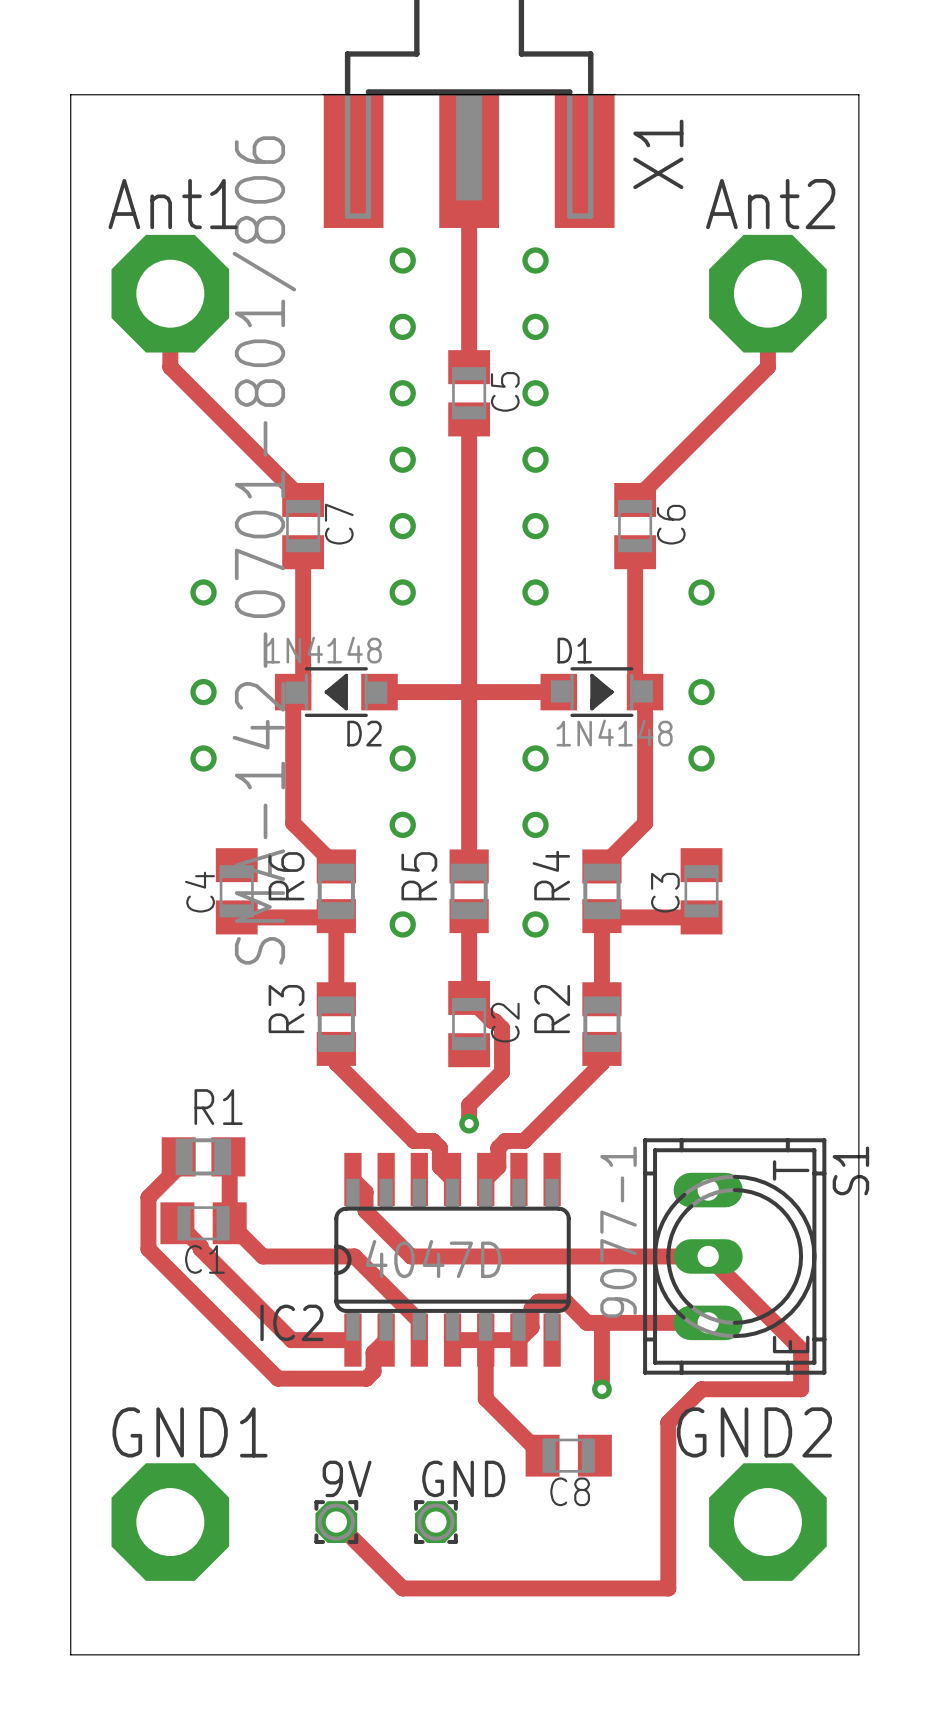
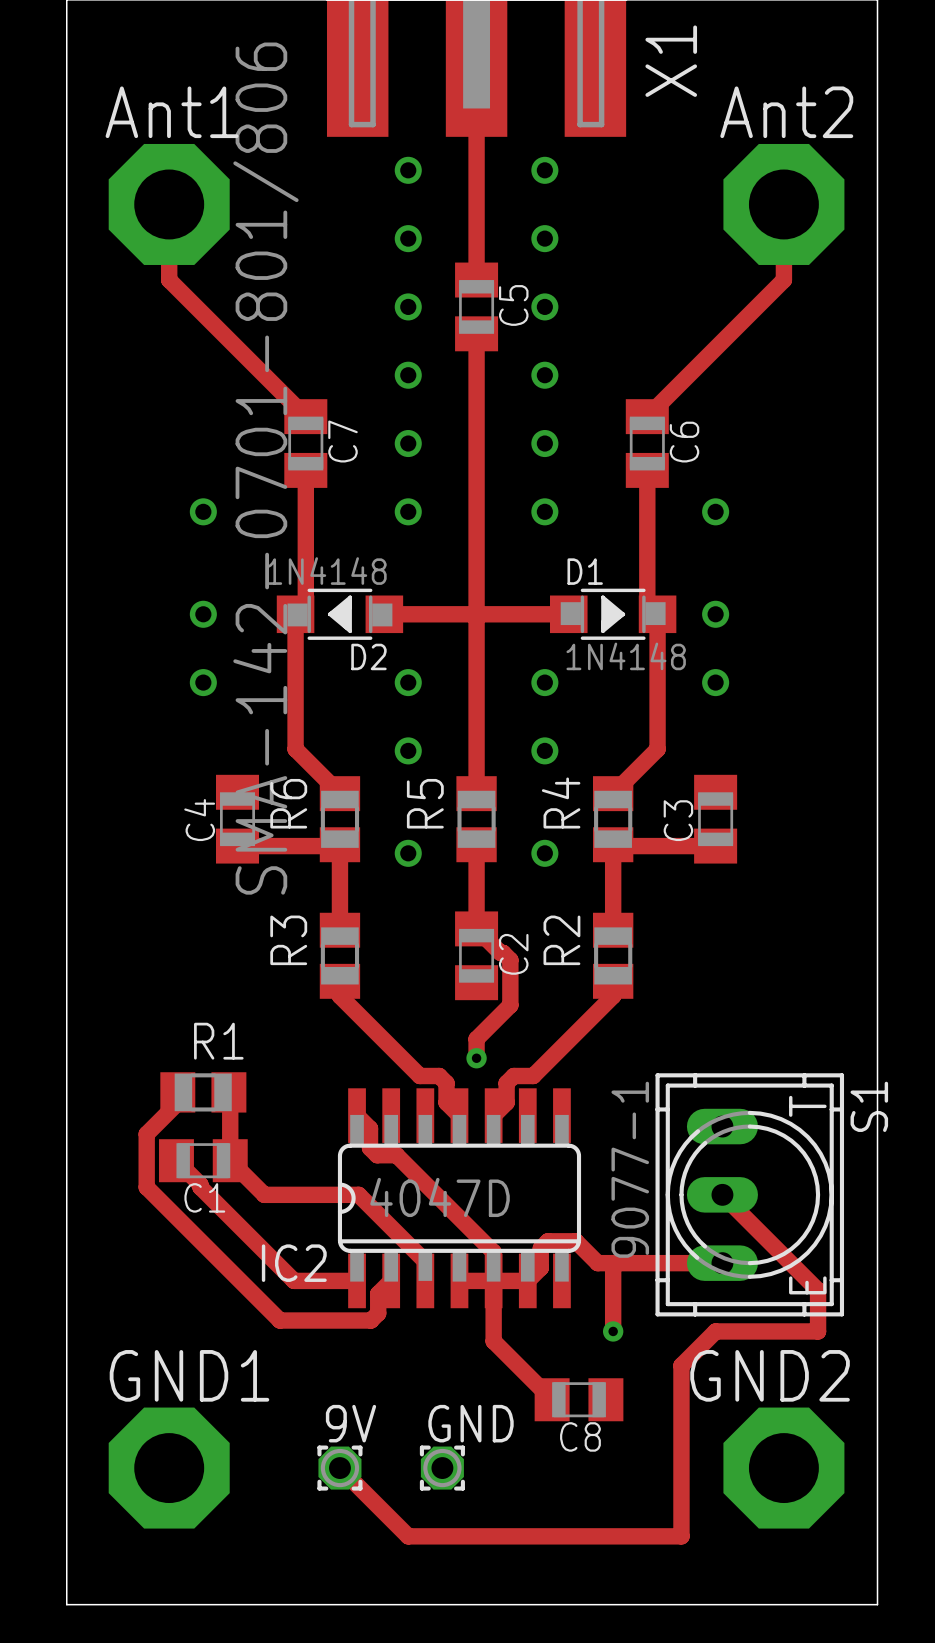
track: (372, 1217) (411, 1256) (708, 1256) -> (377, 1155) (396, 1155) (493, 1252) (493, 1280)

